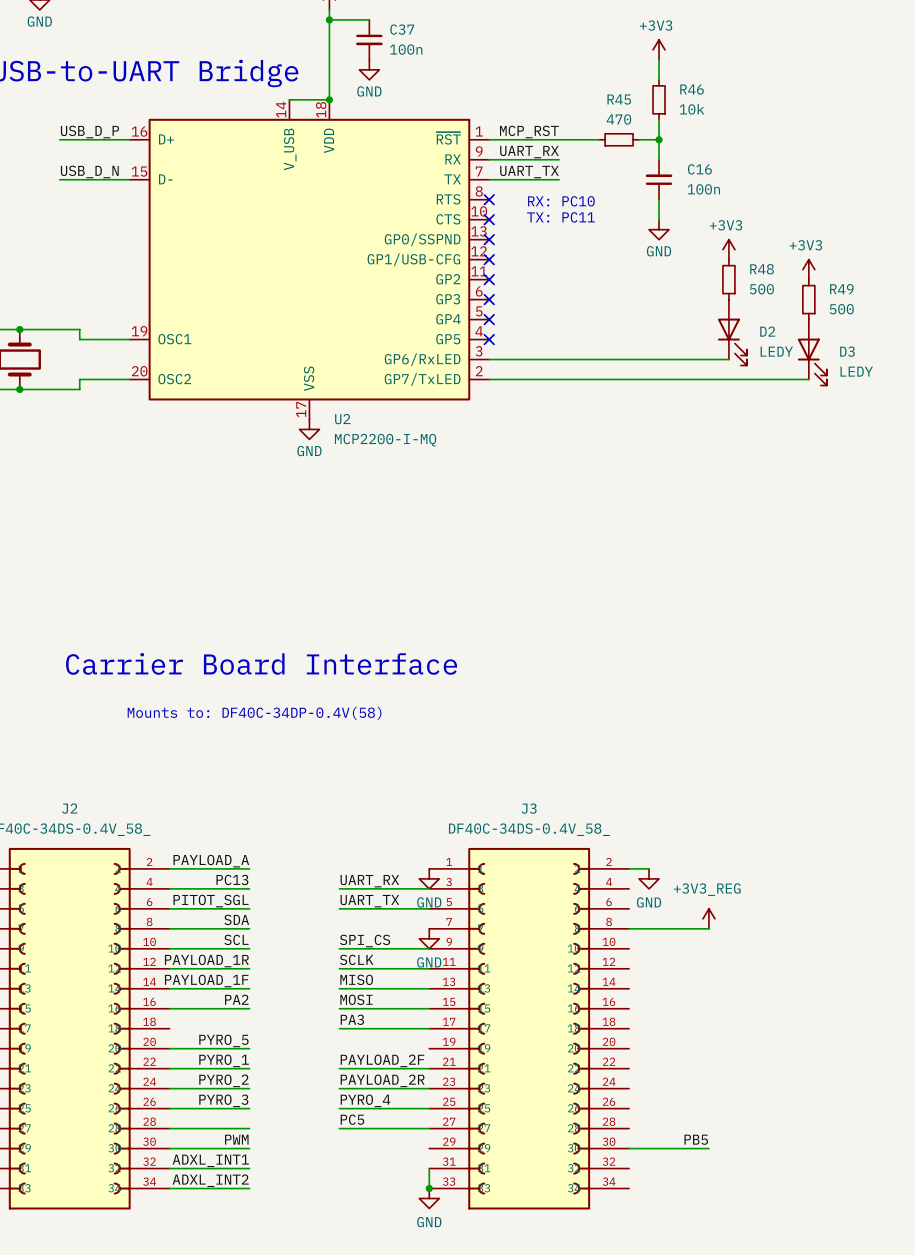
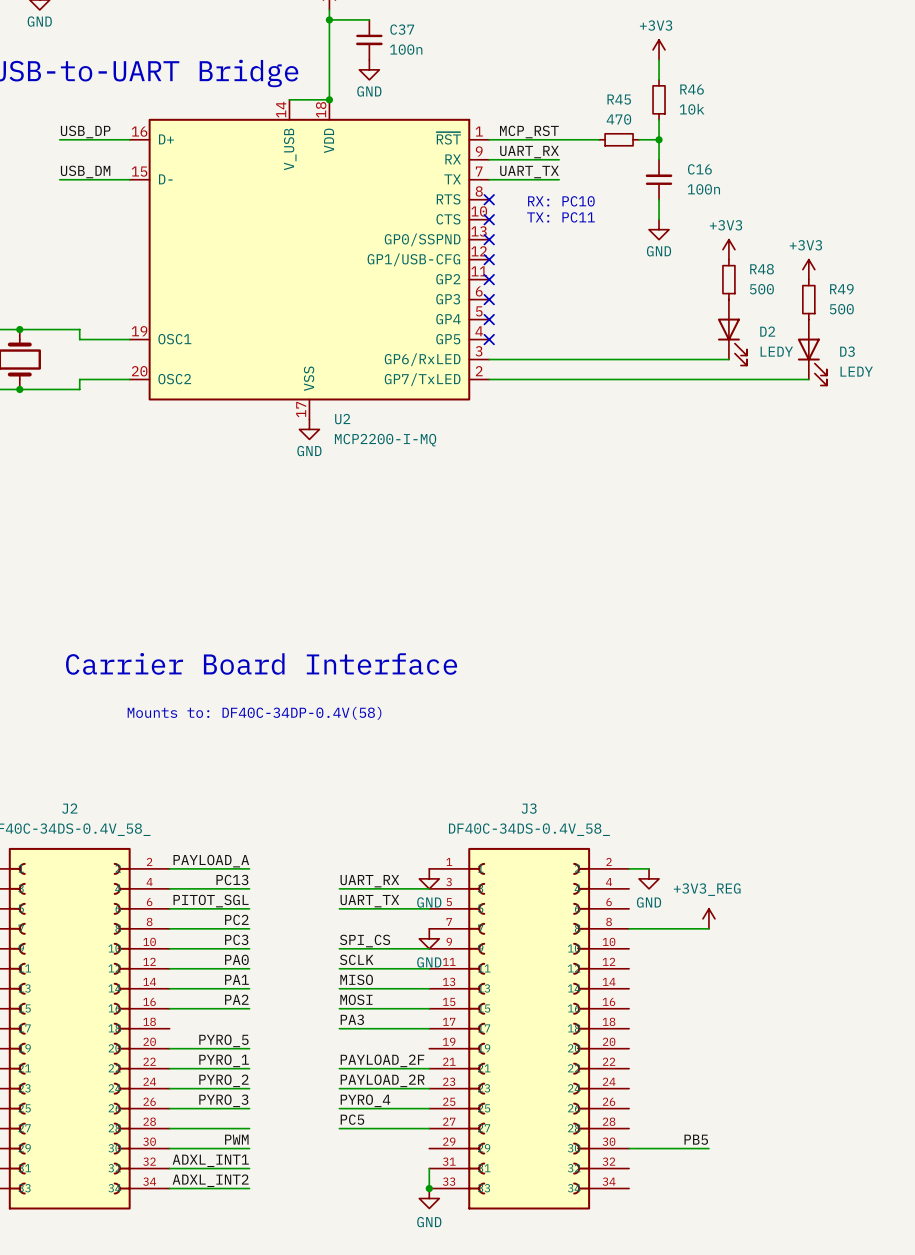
label: USB_D_P (89, 132) -> USB_DP (85, 132)
label: USB_D_N (89, 171) -> USB_DM (85, 171)
label: SDA (236, 919) -> PC2 (236, 919)
label: SCL (236, 939) -> PC3 (236, 939)
label: PAYLOAD_1R (206, 961) -> PA0 (236, 959)
label: PAYLOAD_1F (206, 980) -> PA1 (236, 979)

